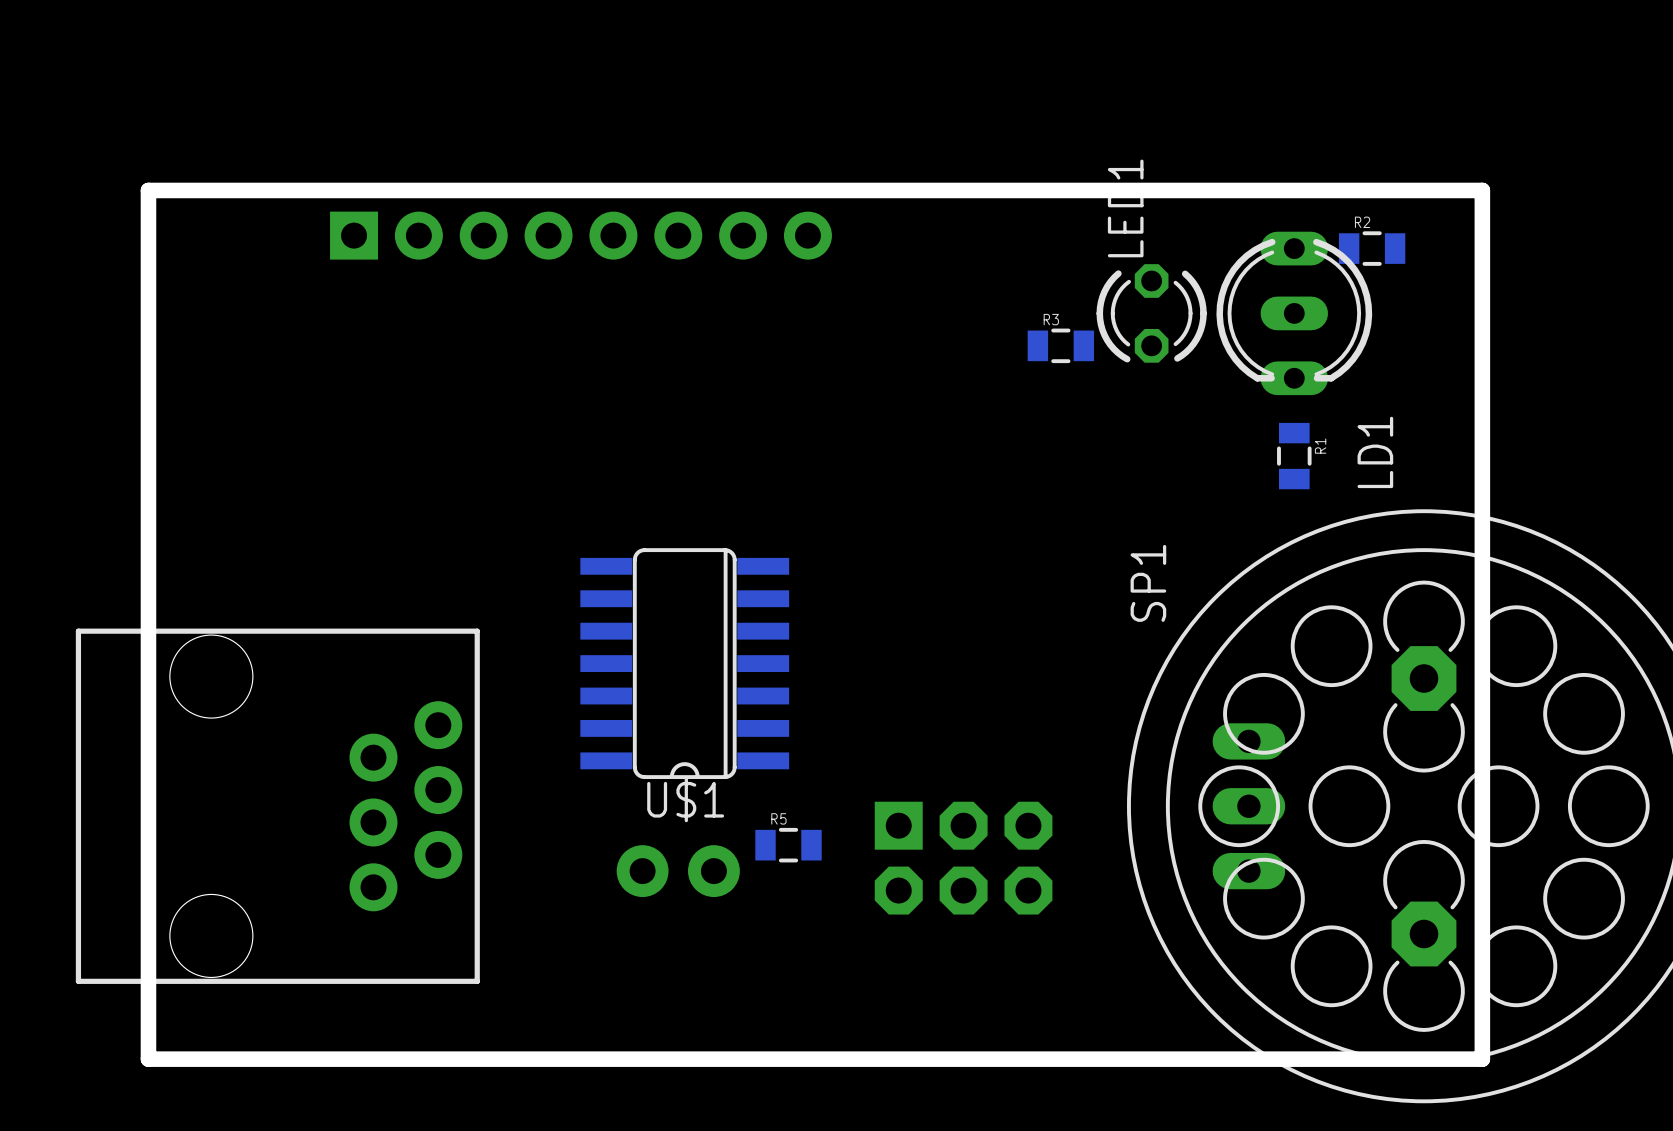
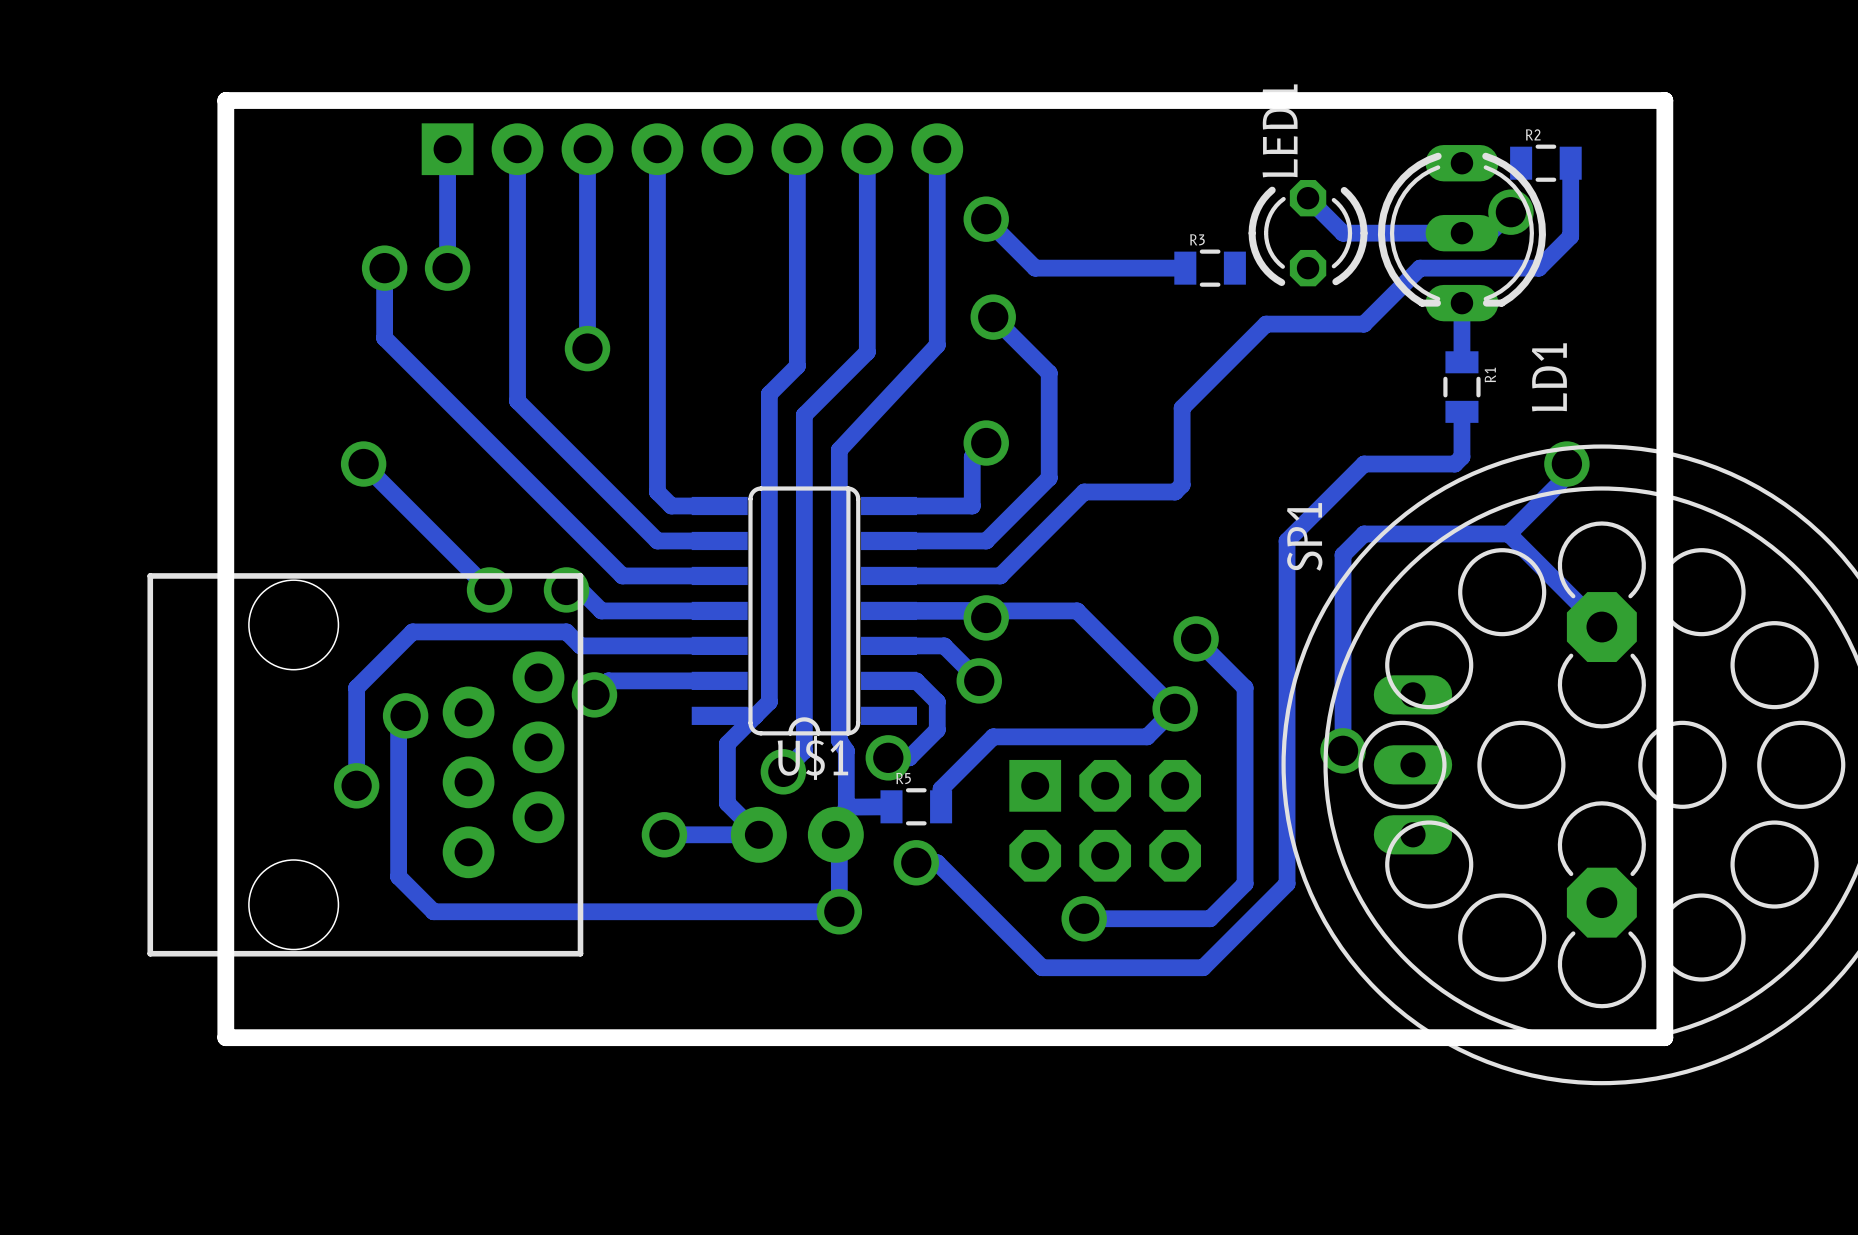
track: none -> (447, 149) (447, 268)
track: none -> (517, 149) (517, 401) (657, 540) (719, 540)
track: none -> (587, 149) (587, 348)
track: none -> (657, 149) (657, 492) (671, 506) (719, 506)
track: none -> (797, 149) (797, 366) (769, 394) (769, 701) (727, 743) (727, 803) (758, 834) (664, 834)
track: none -> (867, 149) (867, 352) (804, 415) (804, 750) (783, 771)
track: none -> (937, 149) (937, 345) (839, 450) (839, 740) (846, 750) (846, 807)
track: none -> (1570, 163) (1570, 236) (1538, 268) (1419, 268) (1364, 324) (1266, 324) (1182, 408) (1182, 485) (1175, 492) (1084, 492) (1000, 575) (889, 575)
track: none -> (1308, 198) (1343, 233) (1489, 233) (1510, 212)
via: none -> (1510, 212)
track: none -> (986, 219) (1035, 268) (1185, 268)
via: none -> (986, 219)
track: none -> (384, 268) (384, 338) (622, 575) (719, 575)
via: none -> (384, 268)
via: none -> (447, 268)
track: none -> (1461, 303) (1461, 362)
track: none -> (993, 317) (1049, 373) (1049, 478) (986, 540) (889, 540)
via: none -> (993, 317)
via: none -> (587, 348)
track: none -> (1461, 411) (1461, 457) (1454, 464) (1364, 464) (1287, 540) (1287, 883) (1203, 967) (1042, 967) (937, 862) (916, 862)
track: none -> (986, 443) (972, 457) (972, 506) (889, 506)
via: none -> (986, 443)
track: none -> (363, 464) (489, 589)
via: none -> (363, 464)
track: none -> (1566, 464) (1566, 475) (1508, 533)
via: none -> (1566, 464)
track: none -> (1508, 533) (1364, 533) (1343, 554) (1343, 750)
track: none -> (1508, 533) (1601, 627)
via: none -> (489, 589)
track: none -> (566, 589) (580, 589) (601, 610) (719, 610)
via: none -> (566, 589)
track: none -> (889, 610) (1077, 610) (1175, 708) (1147, 736) (993, 736) (941, 789) (941, 806)
via: none -> (986, 617)
track: none -> (1196, 638) (1245, 687) (1245, 883) (1210, 918) (1084, 918)
via: none -> (1196, 638)
track: none -> (719, 645) (580, 645) (566, 631) (412, 631) (356, 687) (356, 785)
track: none -> (889, 645) (944, 645) (979, 680)
track: none -> (719, 680) (608, 680) (594, 694)
track: none -> (889, 680) (916, 680) (937, 701) (937, 729) (909, 757) (888, 757)
via: none -> (979, 680)
via: none -> (594, 694)
via: none -> (1175, 708)
track: none -> (405, 715) (398, 722) (398, 876) (433, 911) (839, 911) (839, 838) (835, 834) (846, 807)
via: none -> (405, 715)
via: none -> (1343, 750)
via: none -> (888, 757)
via: none -> (783, 771)
via: none -> (356, 785)
track: none -> (891, 806) (846, 807)
via: none -> (664, 834)
via: none -> (916, 862)
via: none -> (839, 911)
via: none -> (1084, 918)

